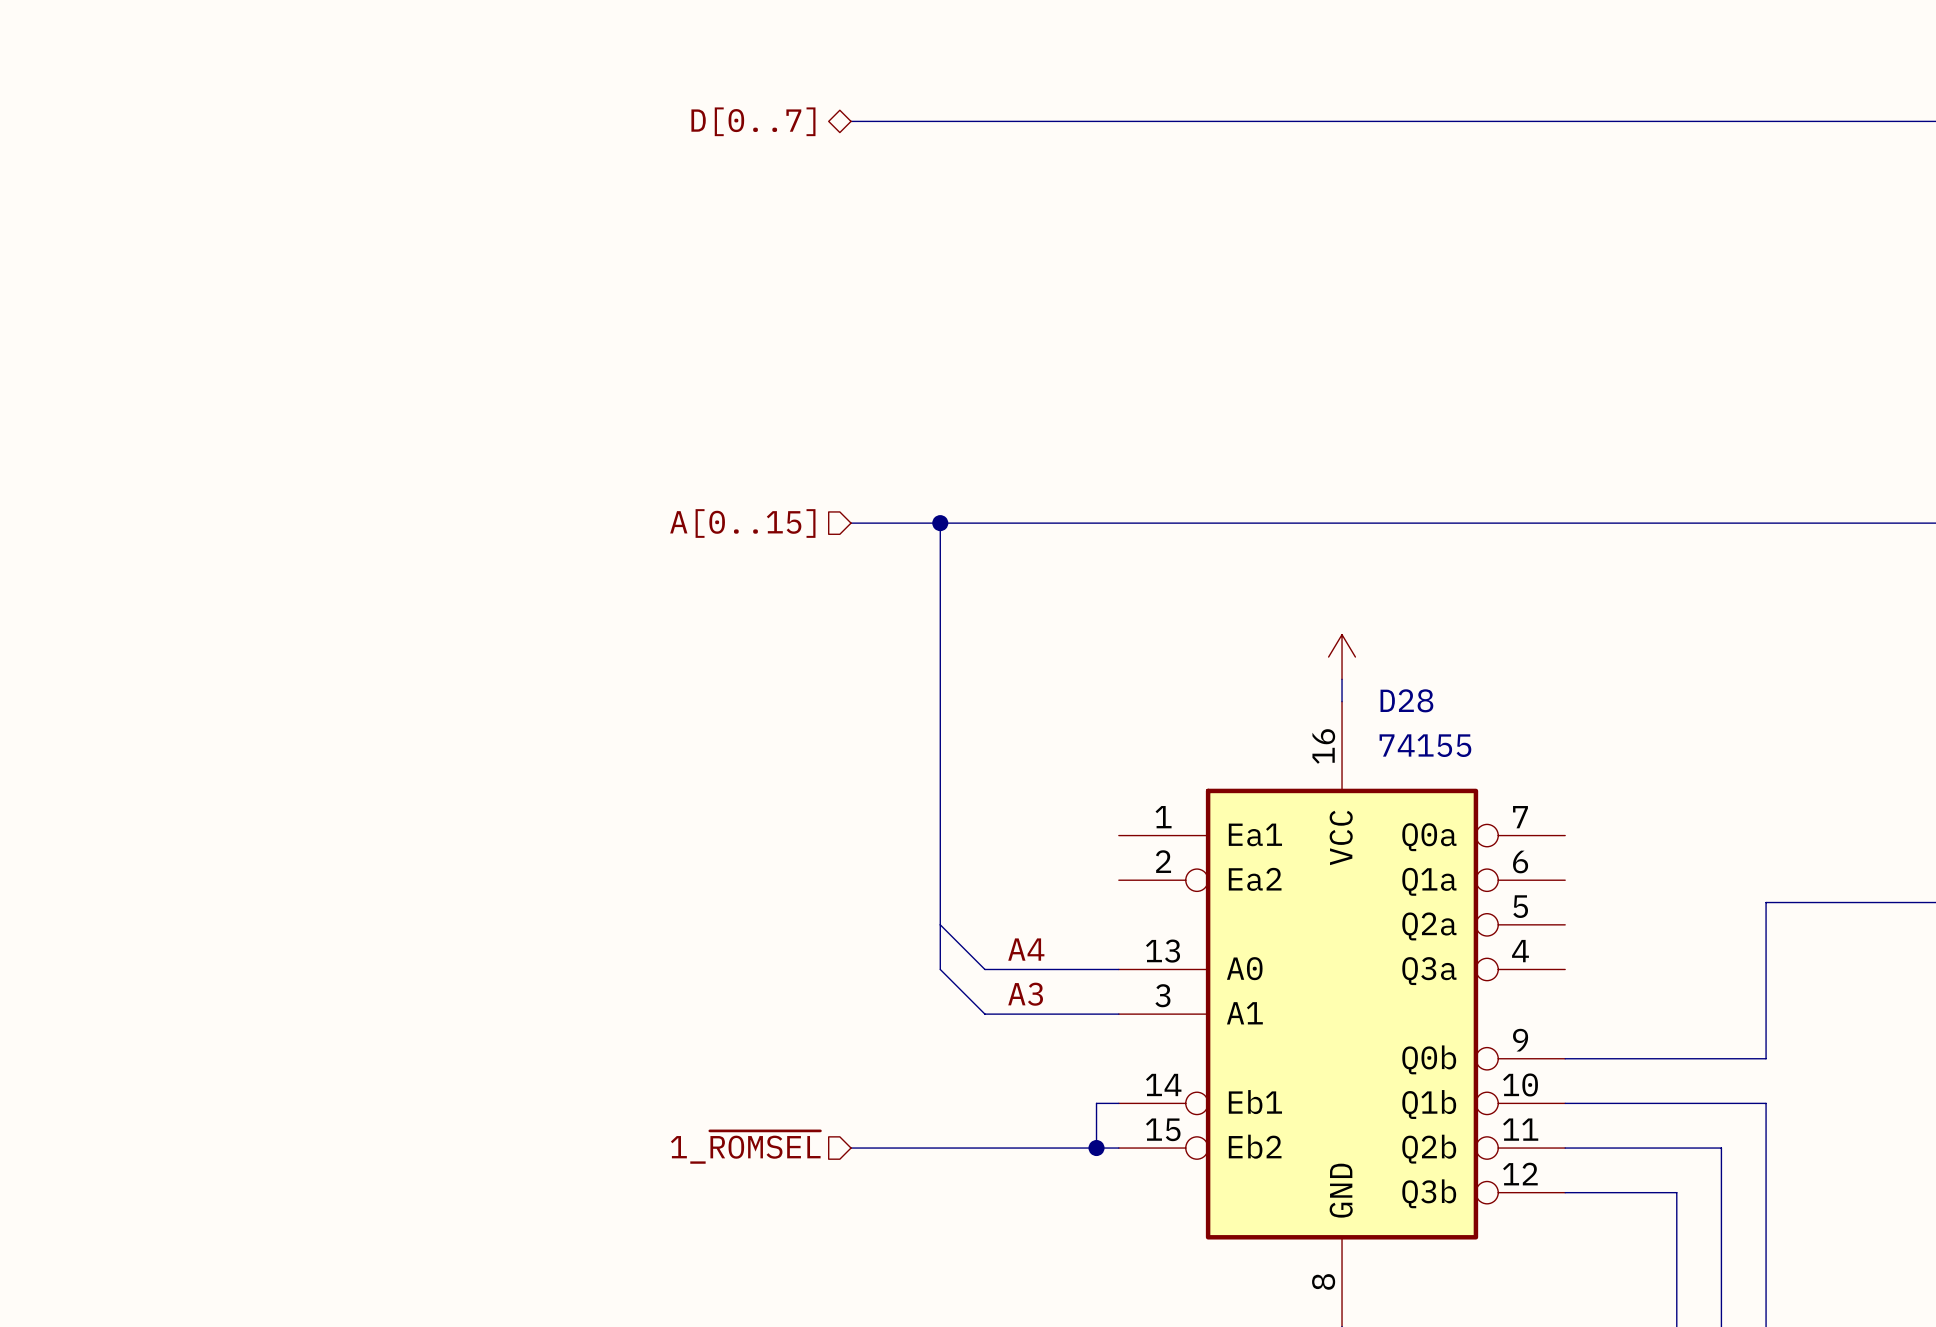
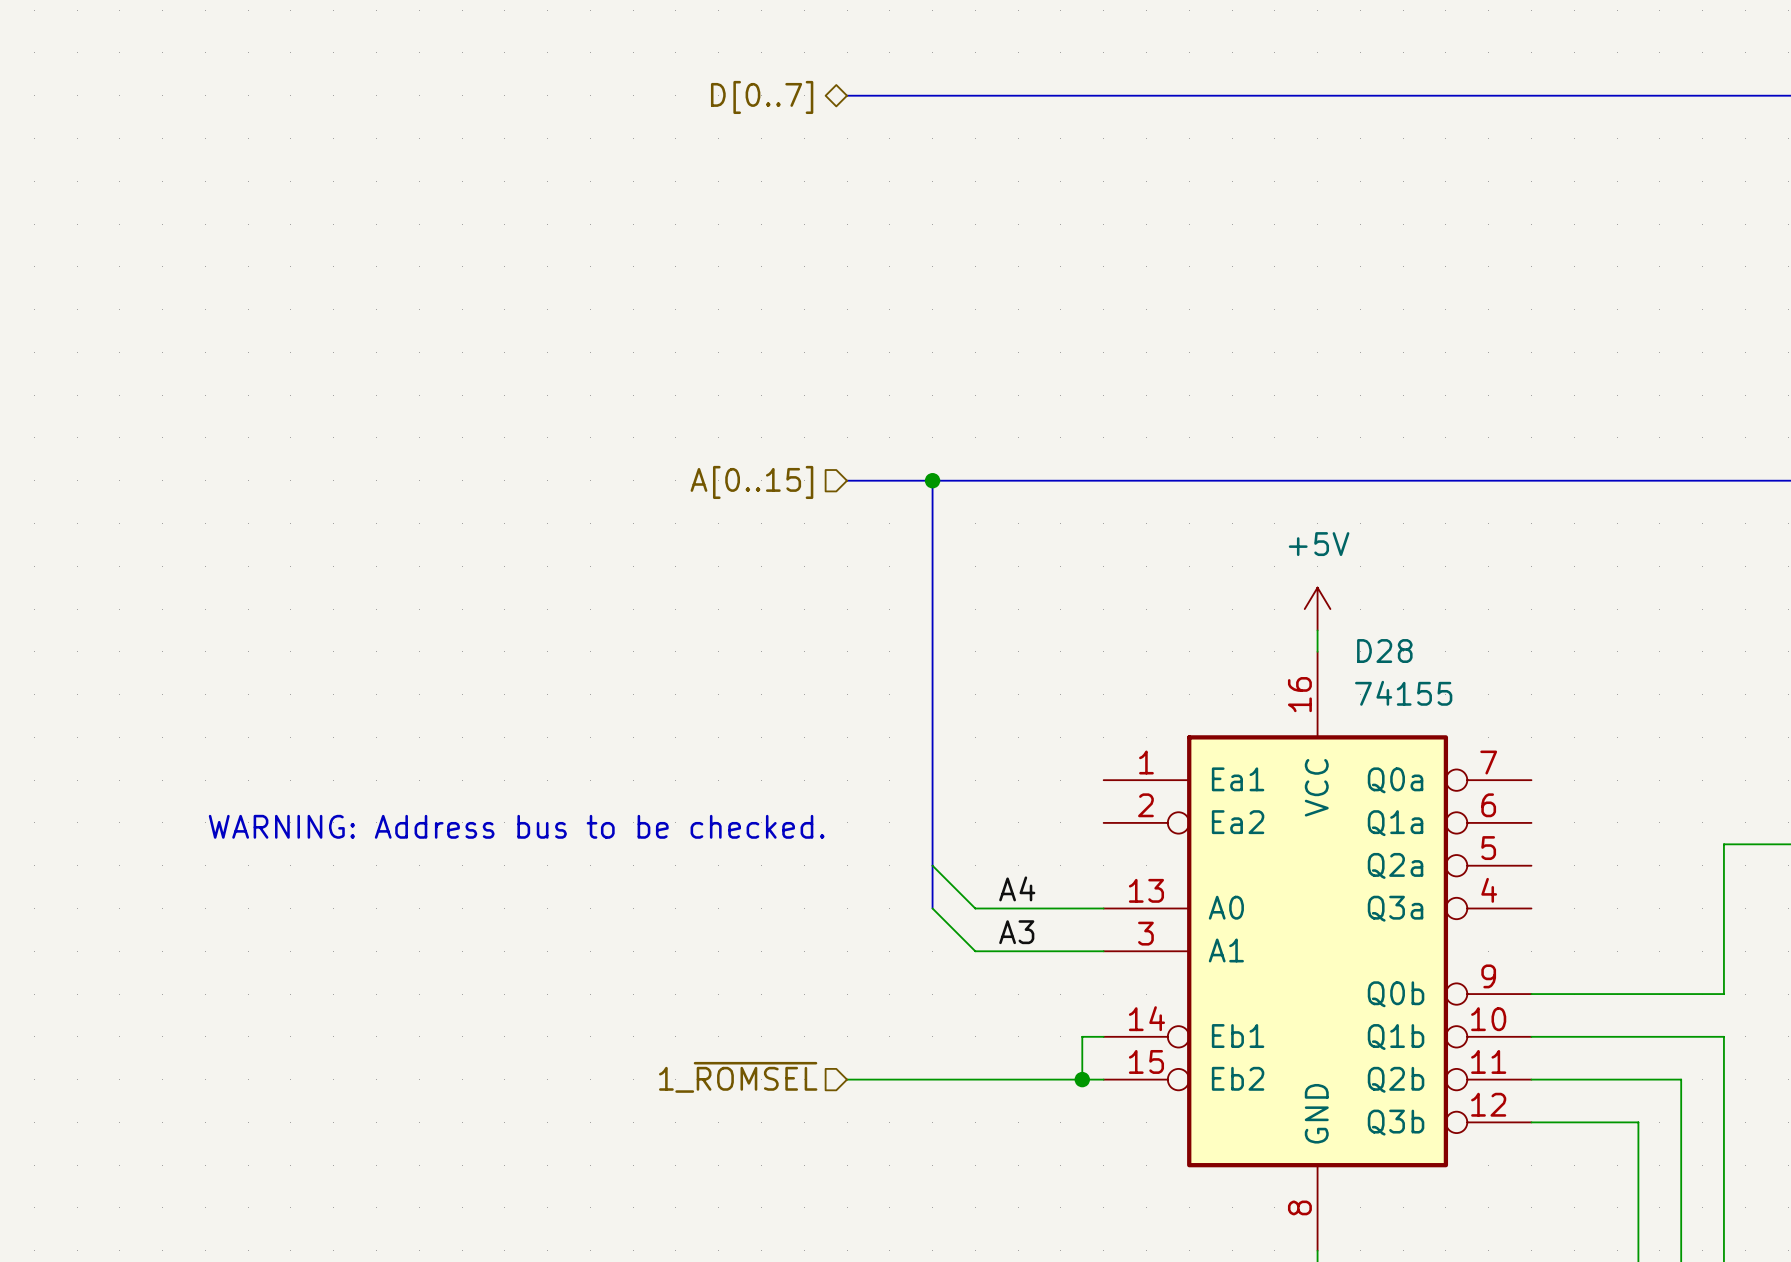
power symbol text: none -> +5V (1319, 544)
text: none -> WARNING: Address bus to be checked. (516, 826)

